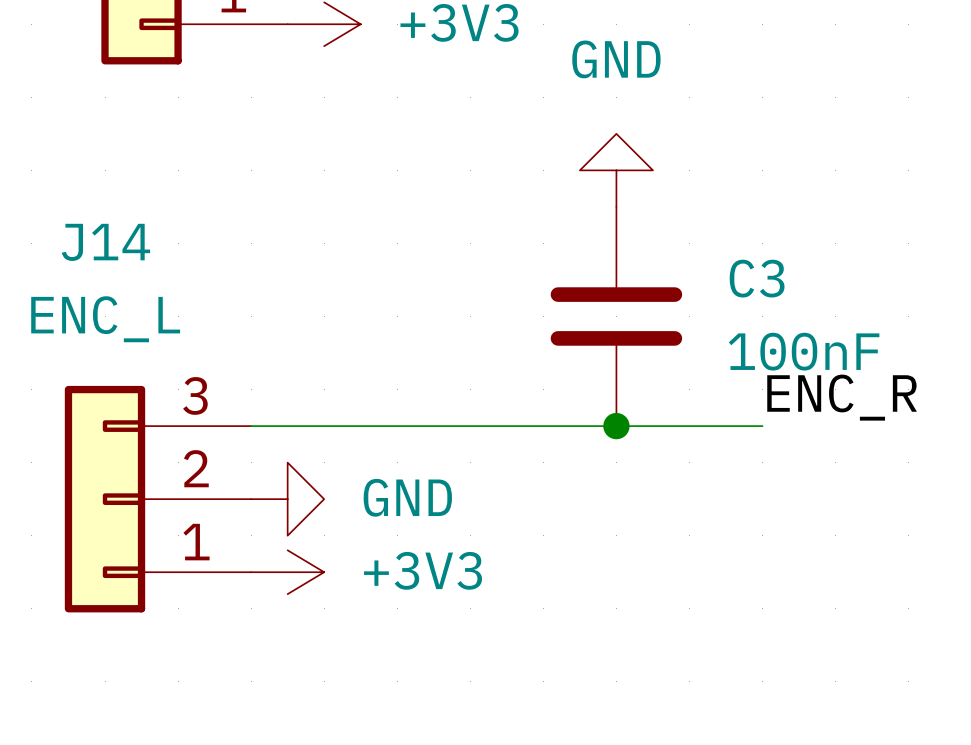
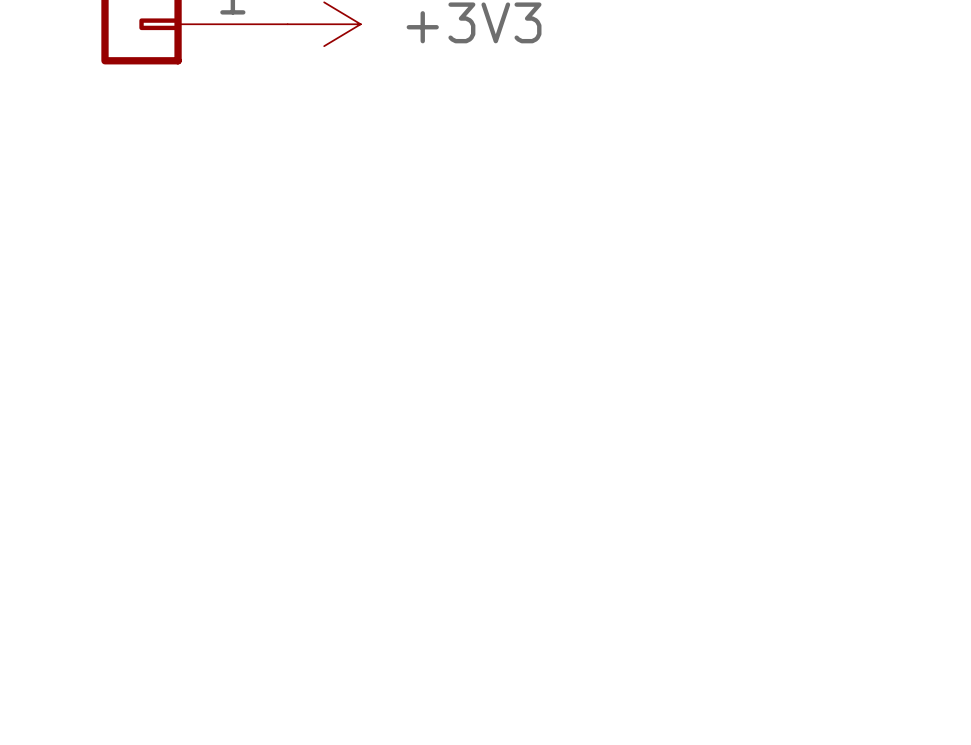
power symbol: GND (616, 170) -> none
C3: 100nF (616, 316) -> none
label: ENC_R (842, 397) -> none
wire: (251, 426) (762, 426) -> none
junction: (616, 426) -> none
J14: ENC_L (157, 499) -> none
power symbol: GND (287, 499) -> none
power symbol: +3V3 (287, 572) -> none

